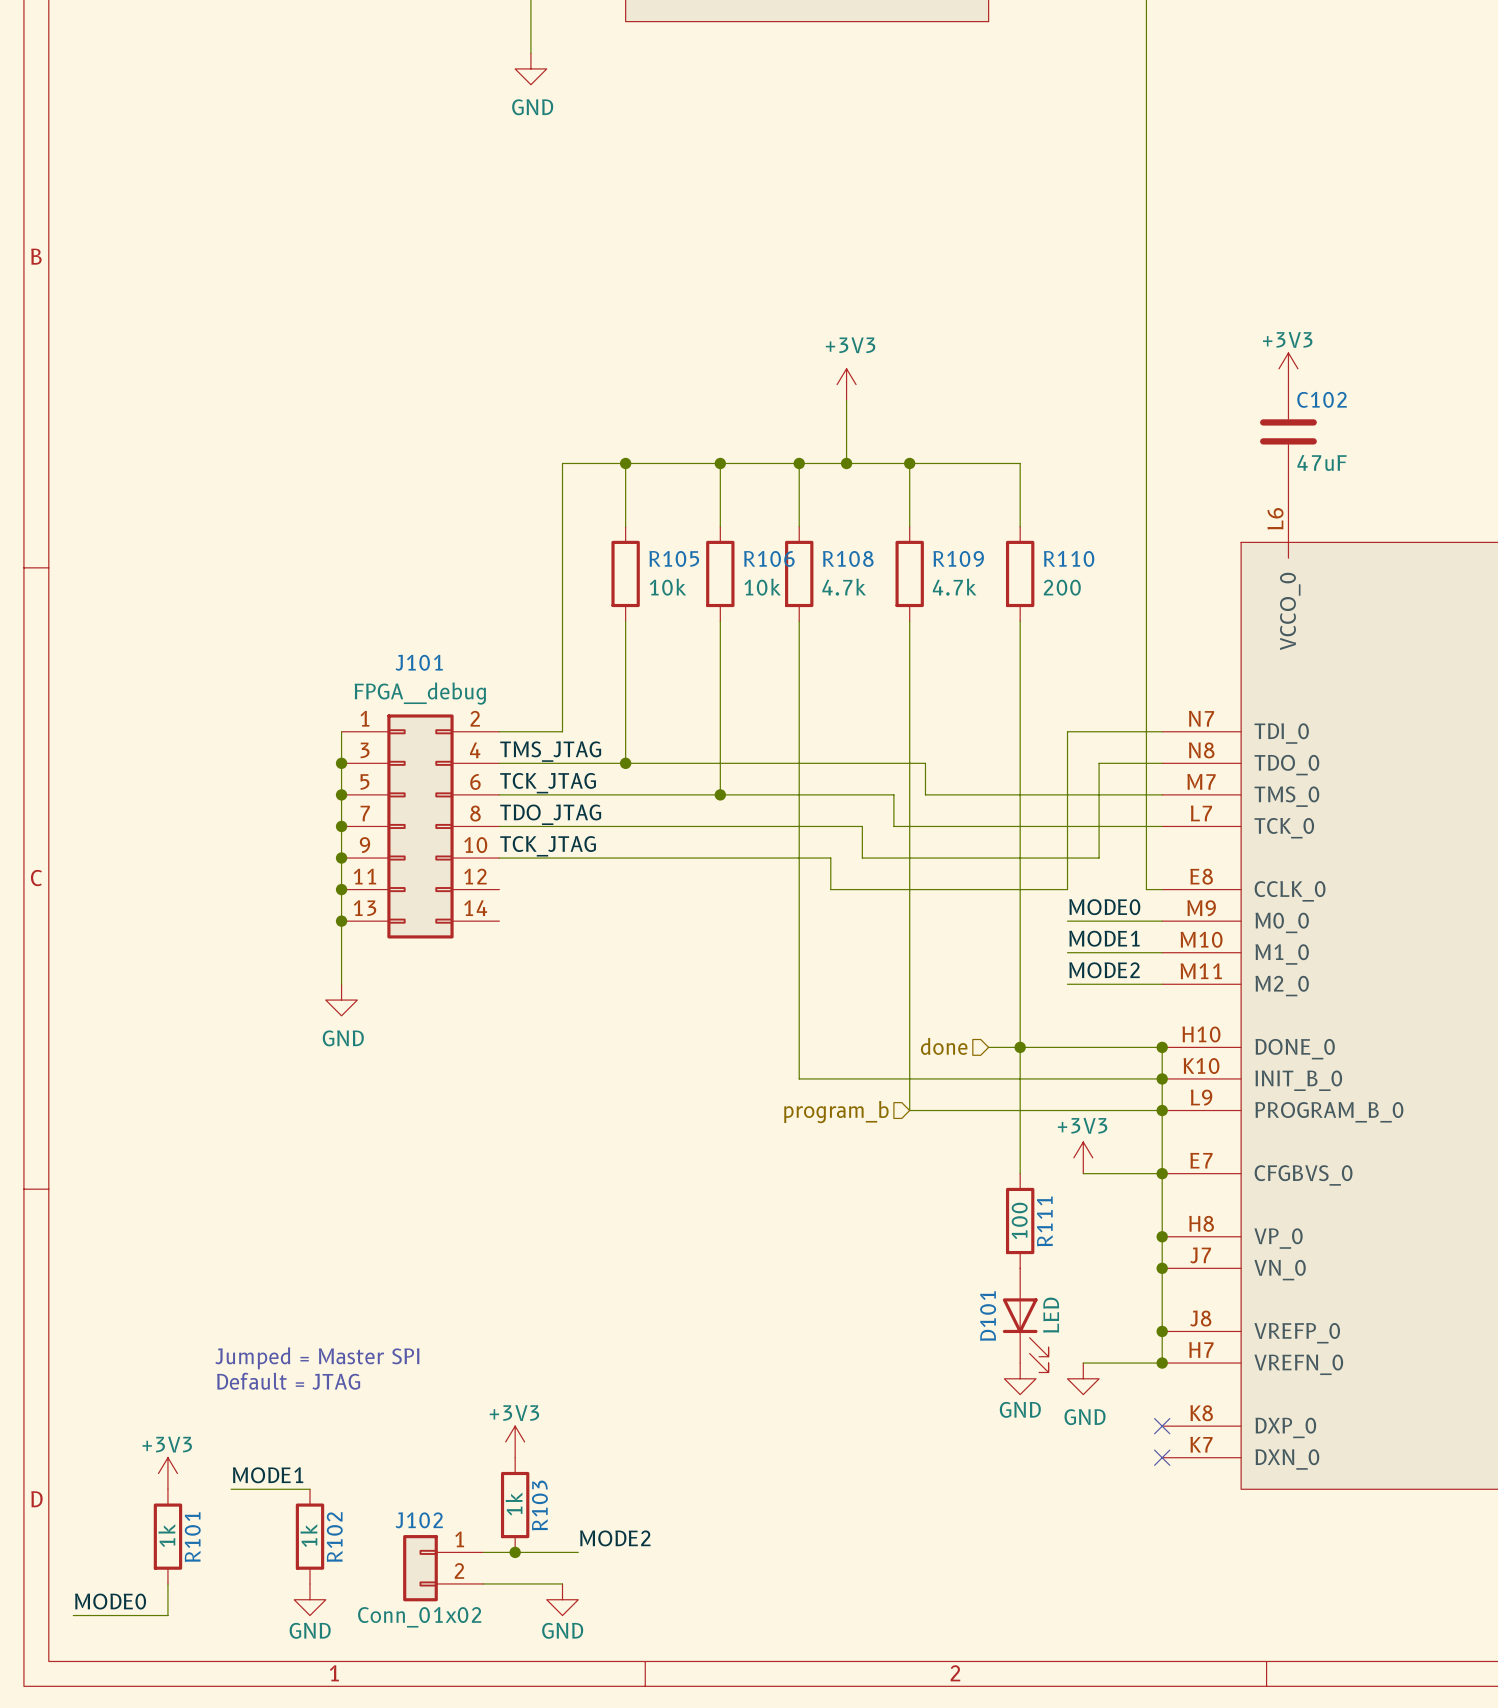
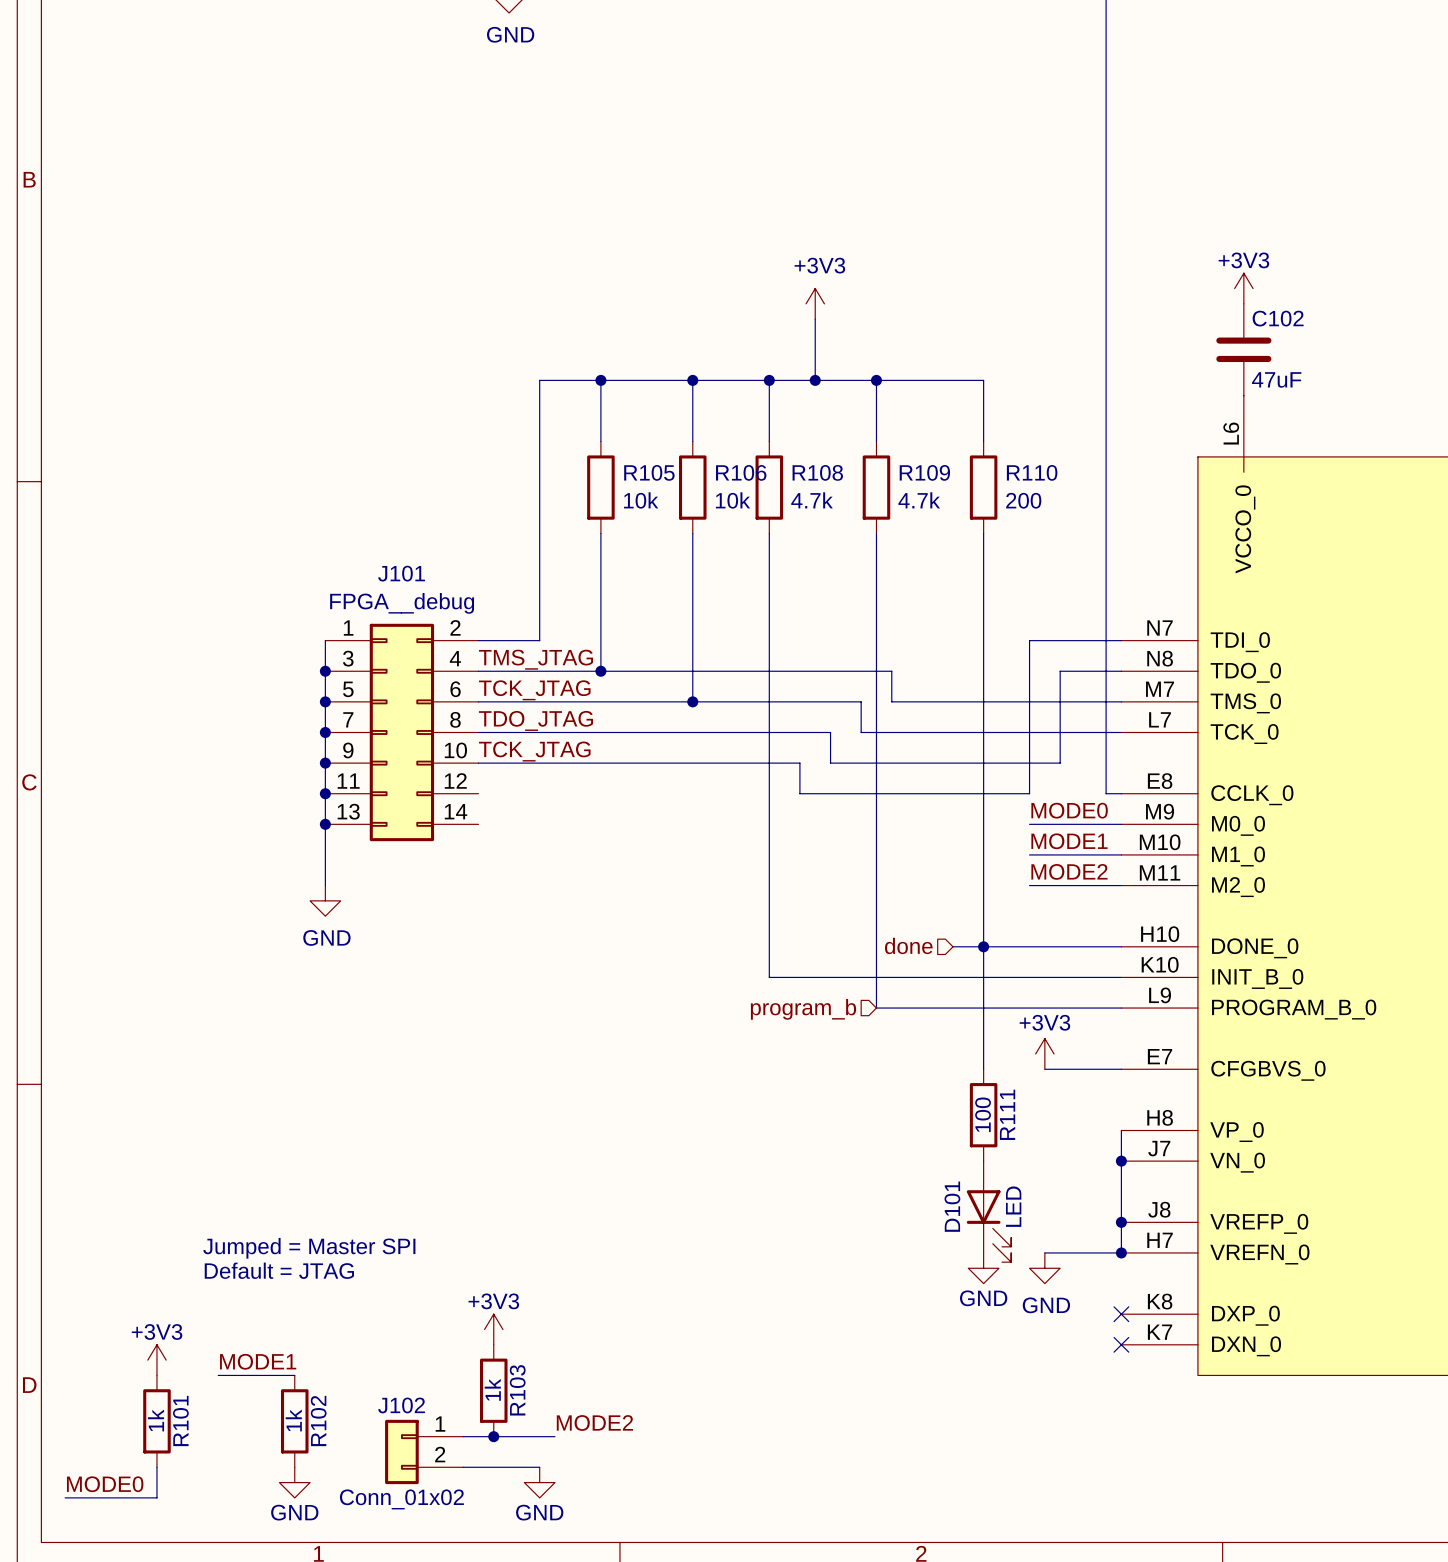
wire: (1162, 1047) (1162, 1236) -> none
junction: (1162, 1047) -> none
junction: (1162, 1078) -> none
junction: (1162, 1110) -> none
junction: (1162, 1173) -> none
junction: (1162, 1236) -> none

